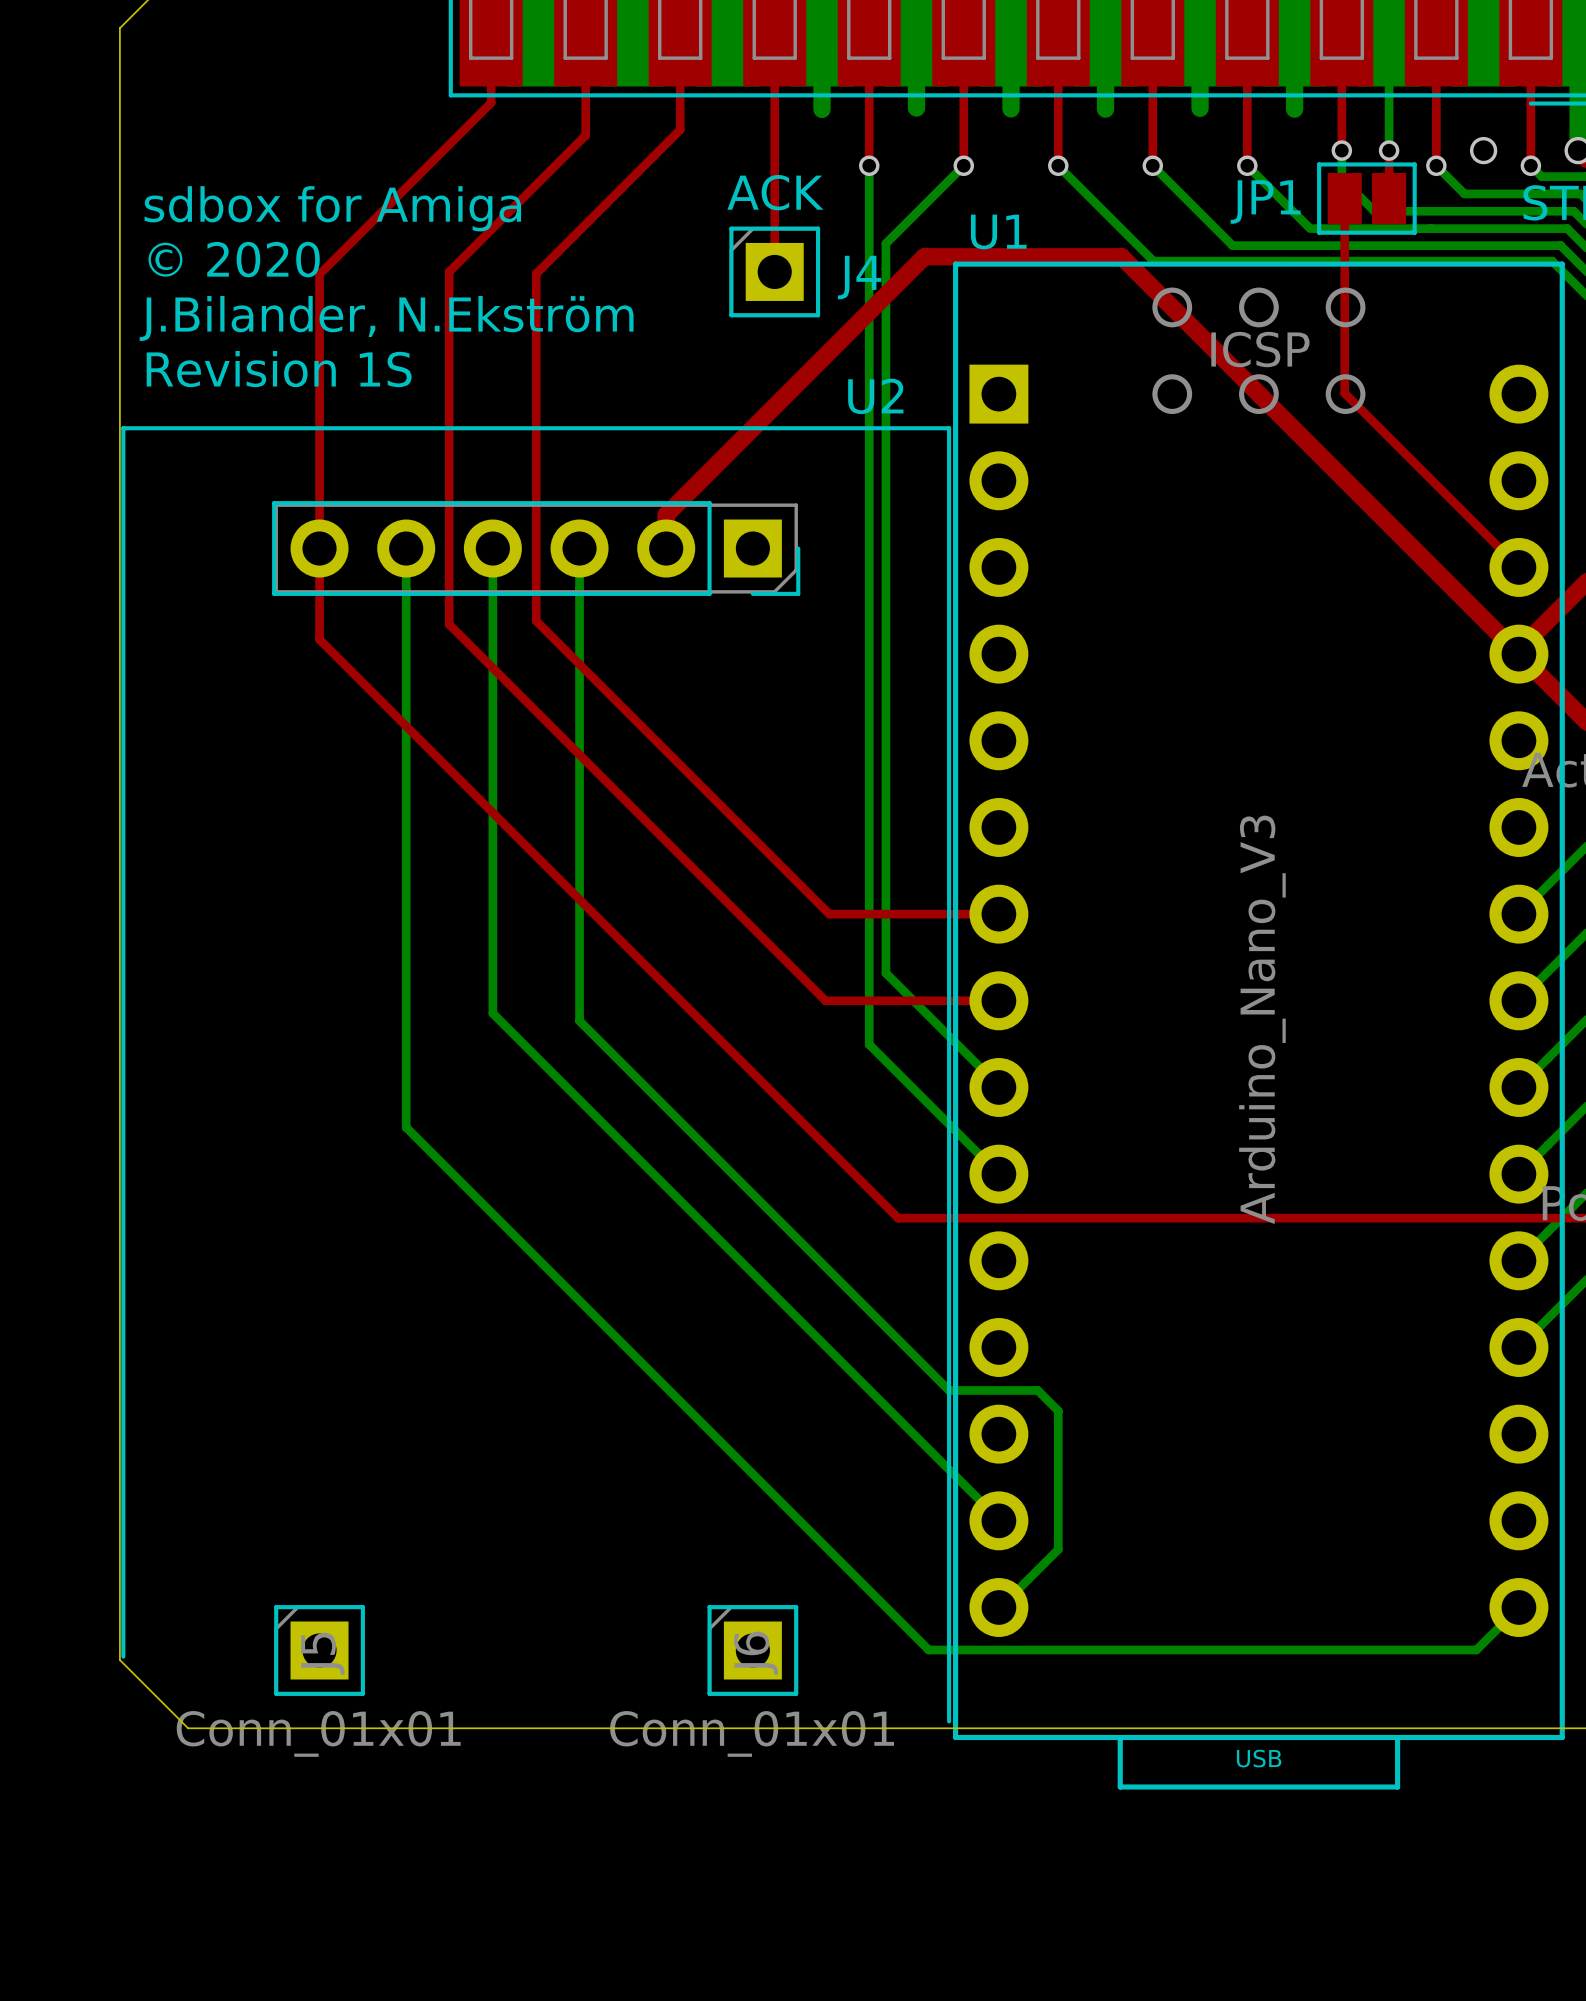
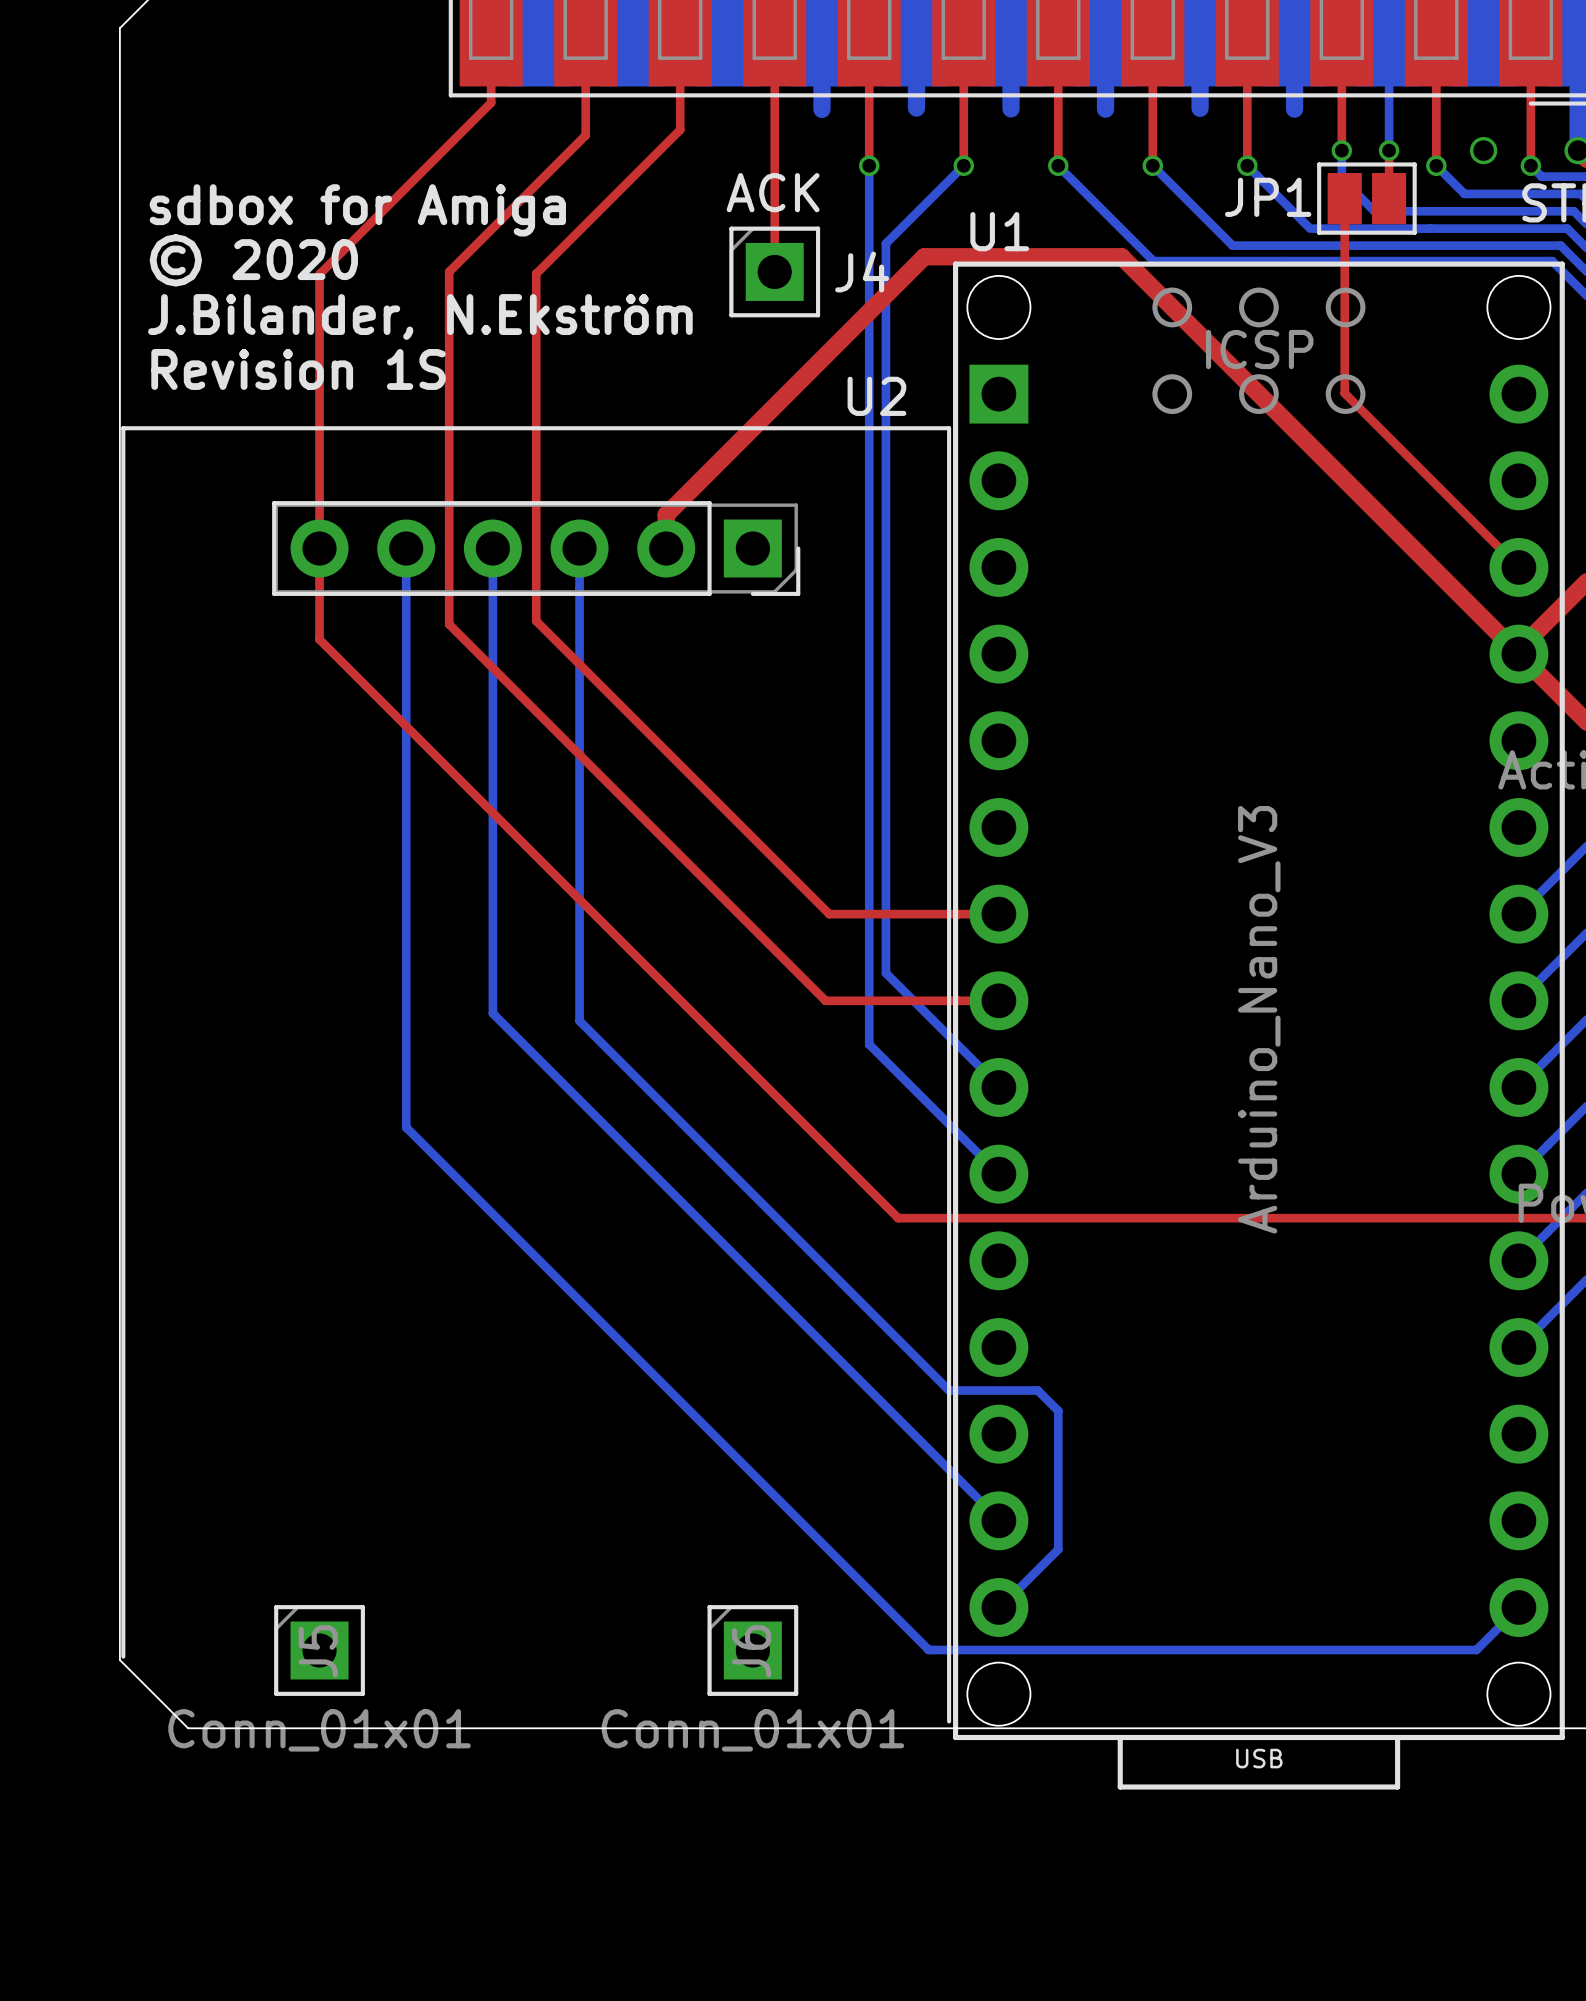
U1 footprint: [953, 261, 1565, 1790] -> [953, 261, 1565, 1790]

